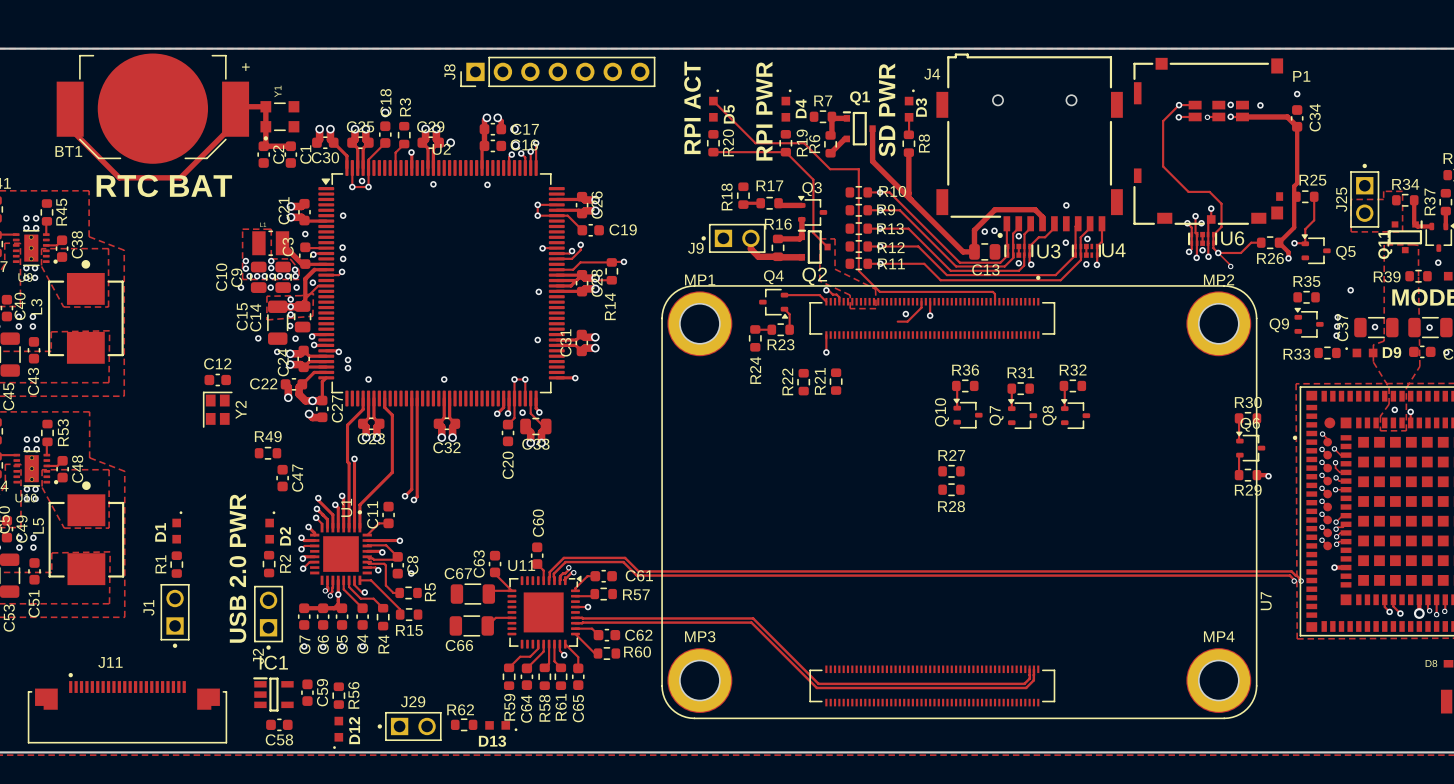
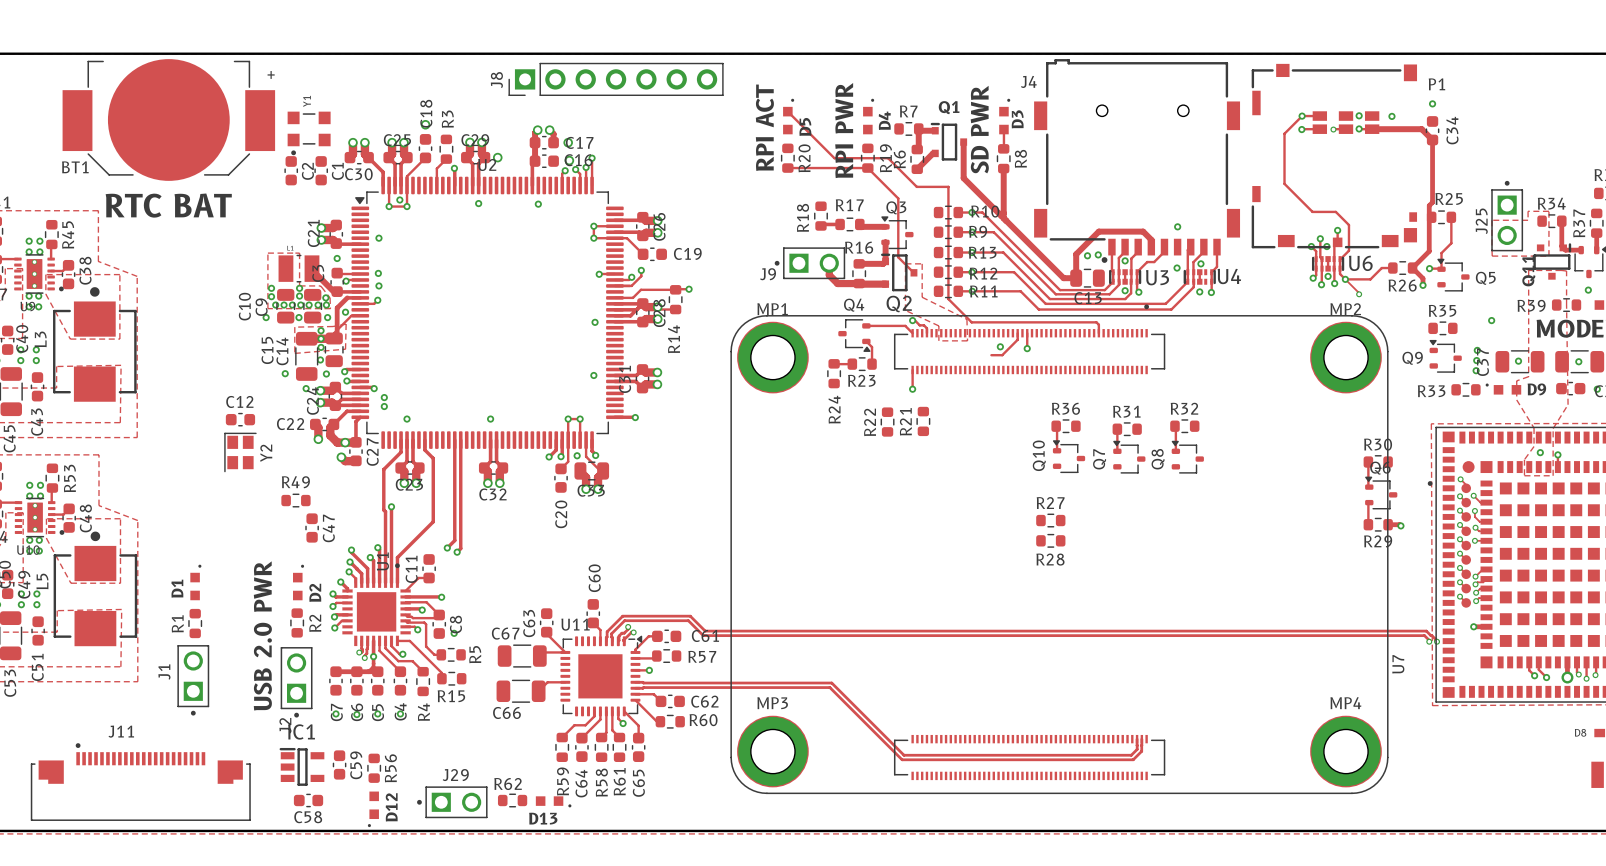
track: (70, 109) (70, 128) (119, 177) (180, 177) (235, 122) (235, 109) (238, 106) (265, 106) (265, 144) (263, 146) (290, 146) -> none

